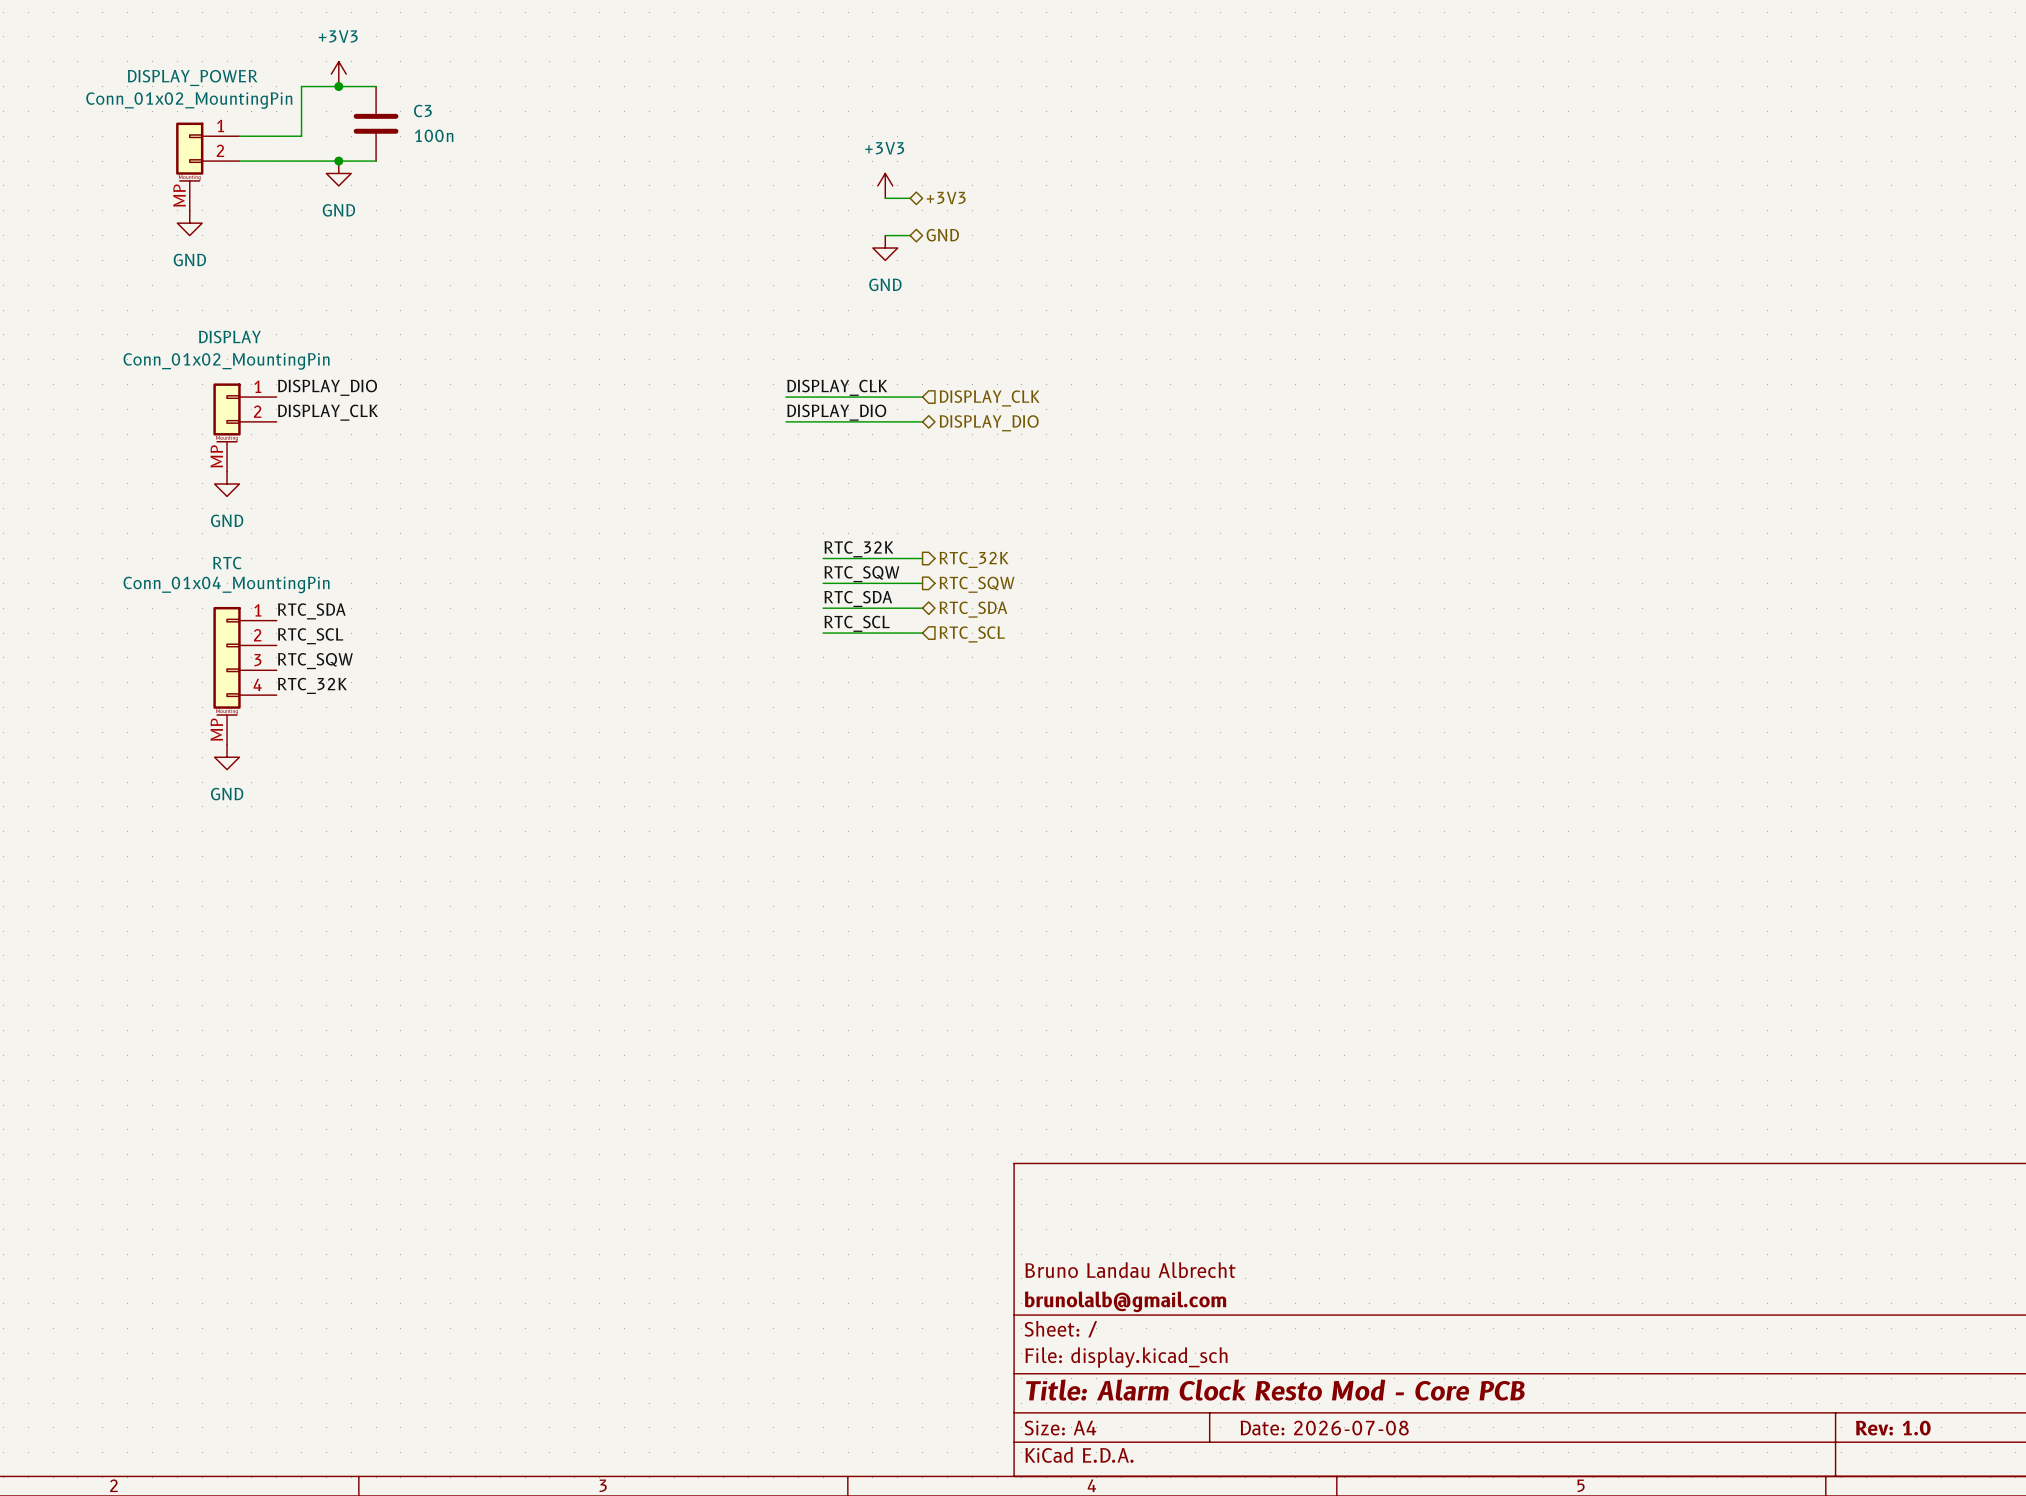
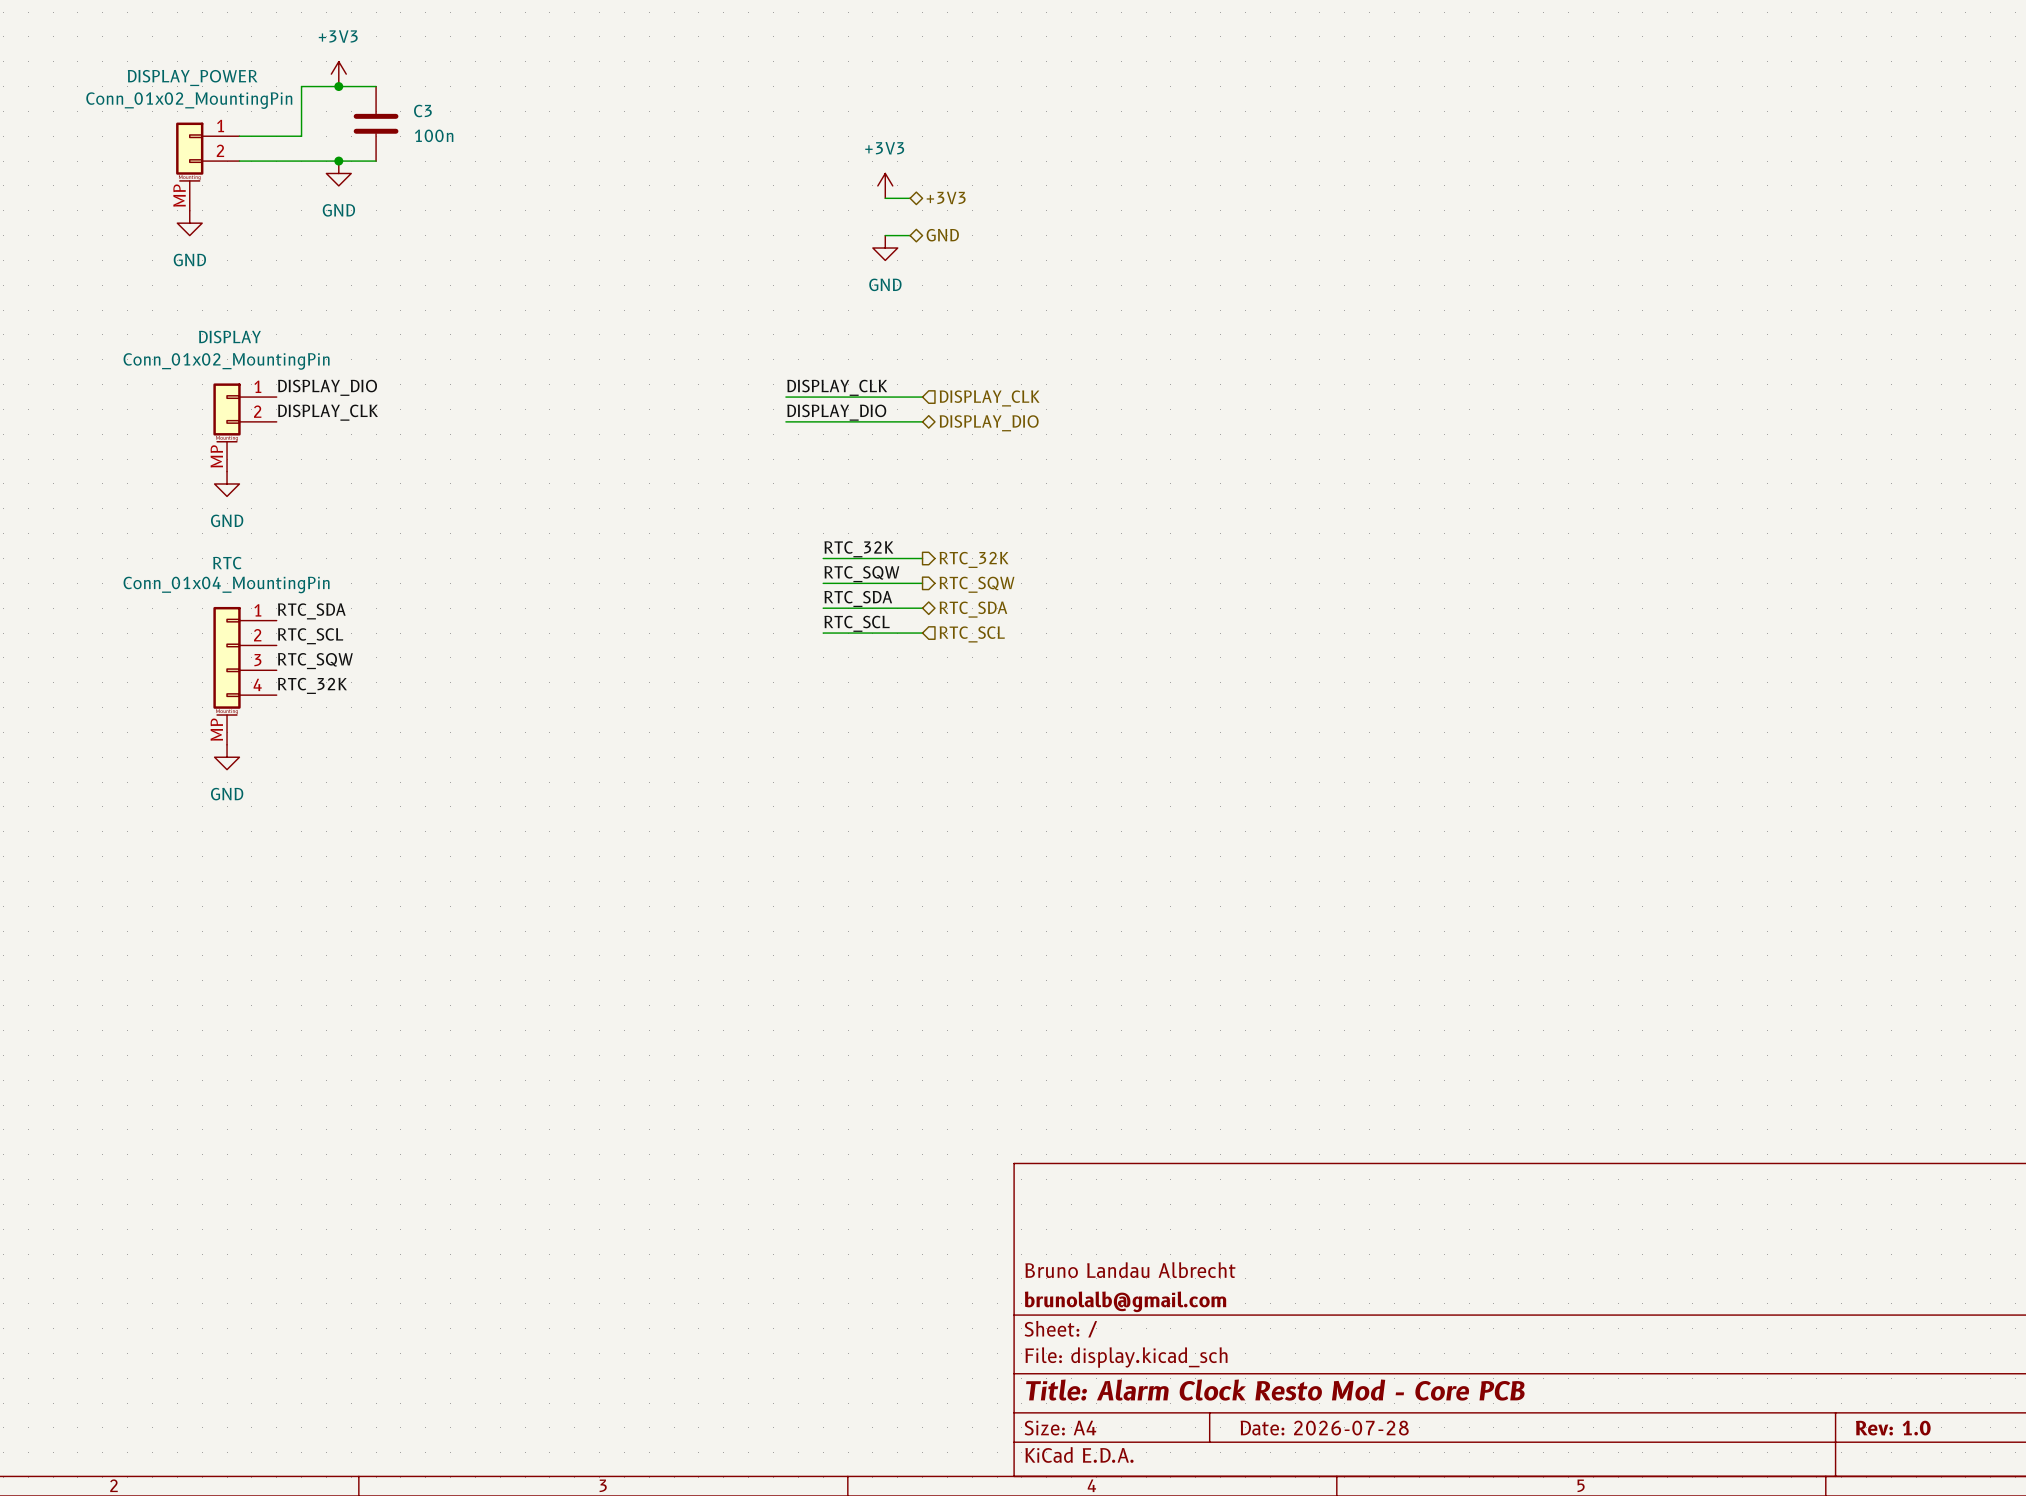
title block: Date: 2026-07-08 (1324, 1428) -> Date: 2026-07-28 (1324, 1428)

